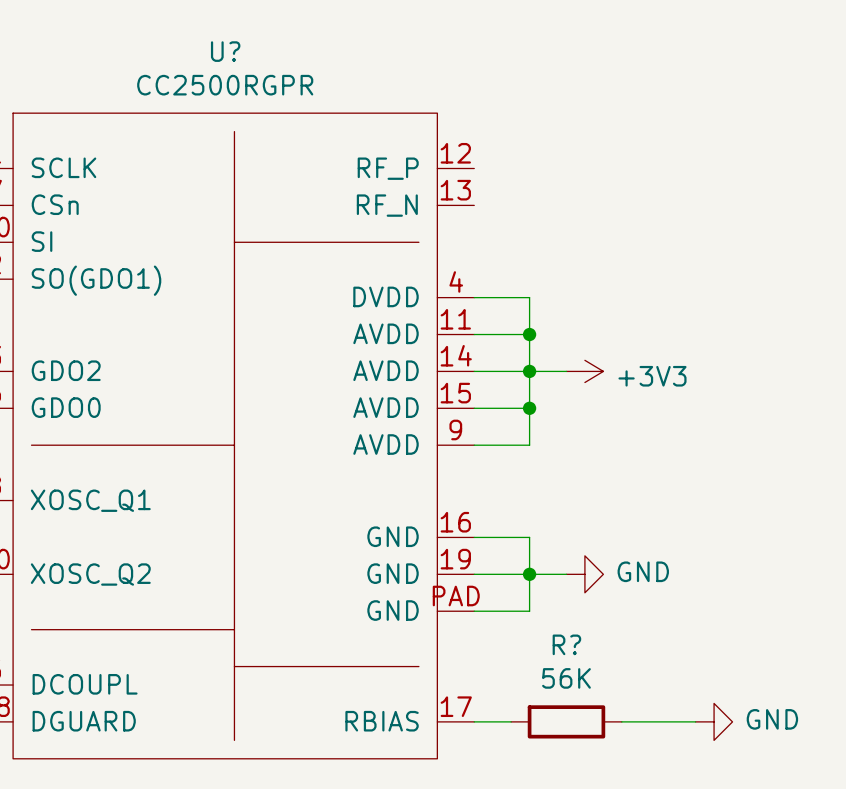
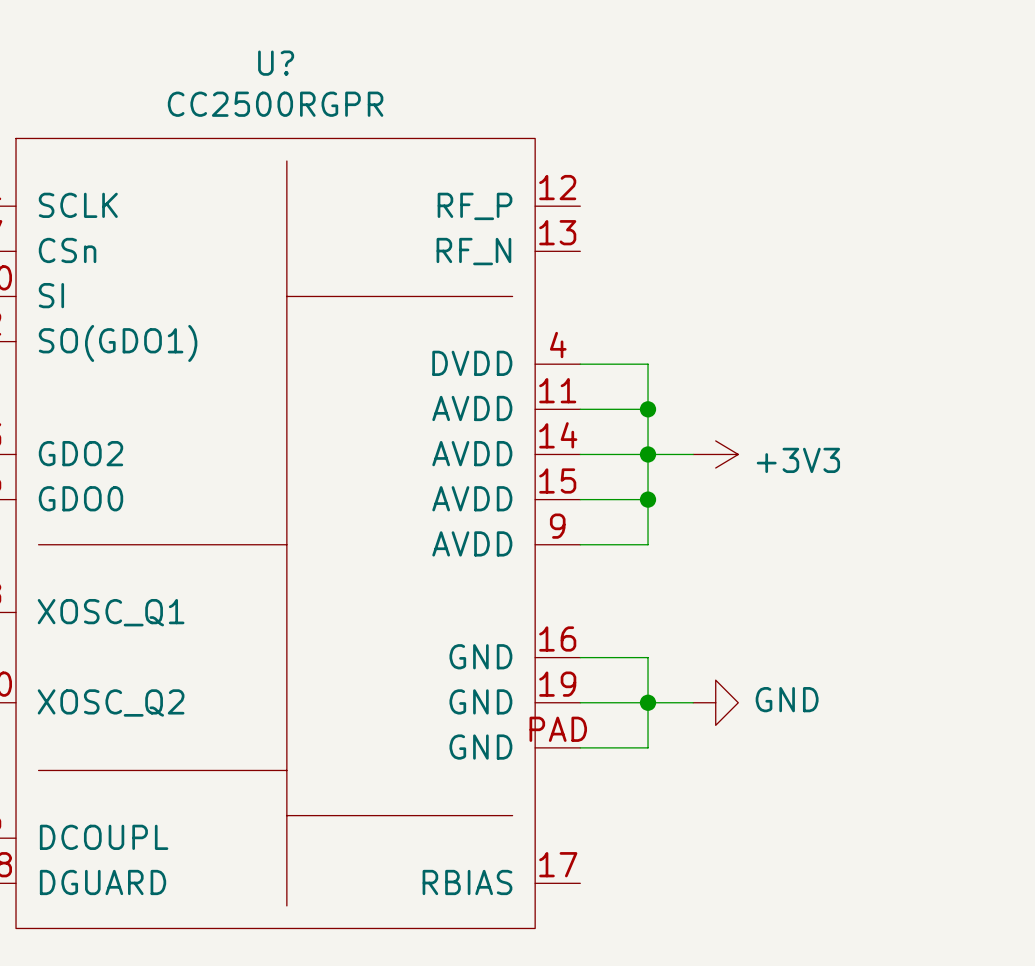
wire: (474, 721) (511, 721) -> none
R?: 56K (566, 721) -> none
wire: (621, 721) (695, 721) -> none
power symbol: GND (714, 721) -> none

